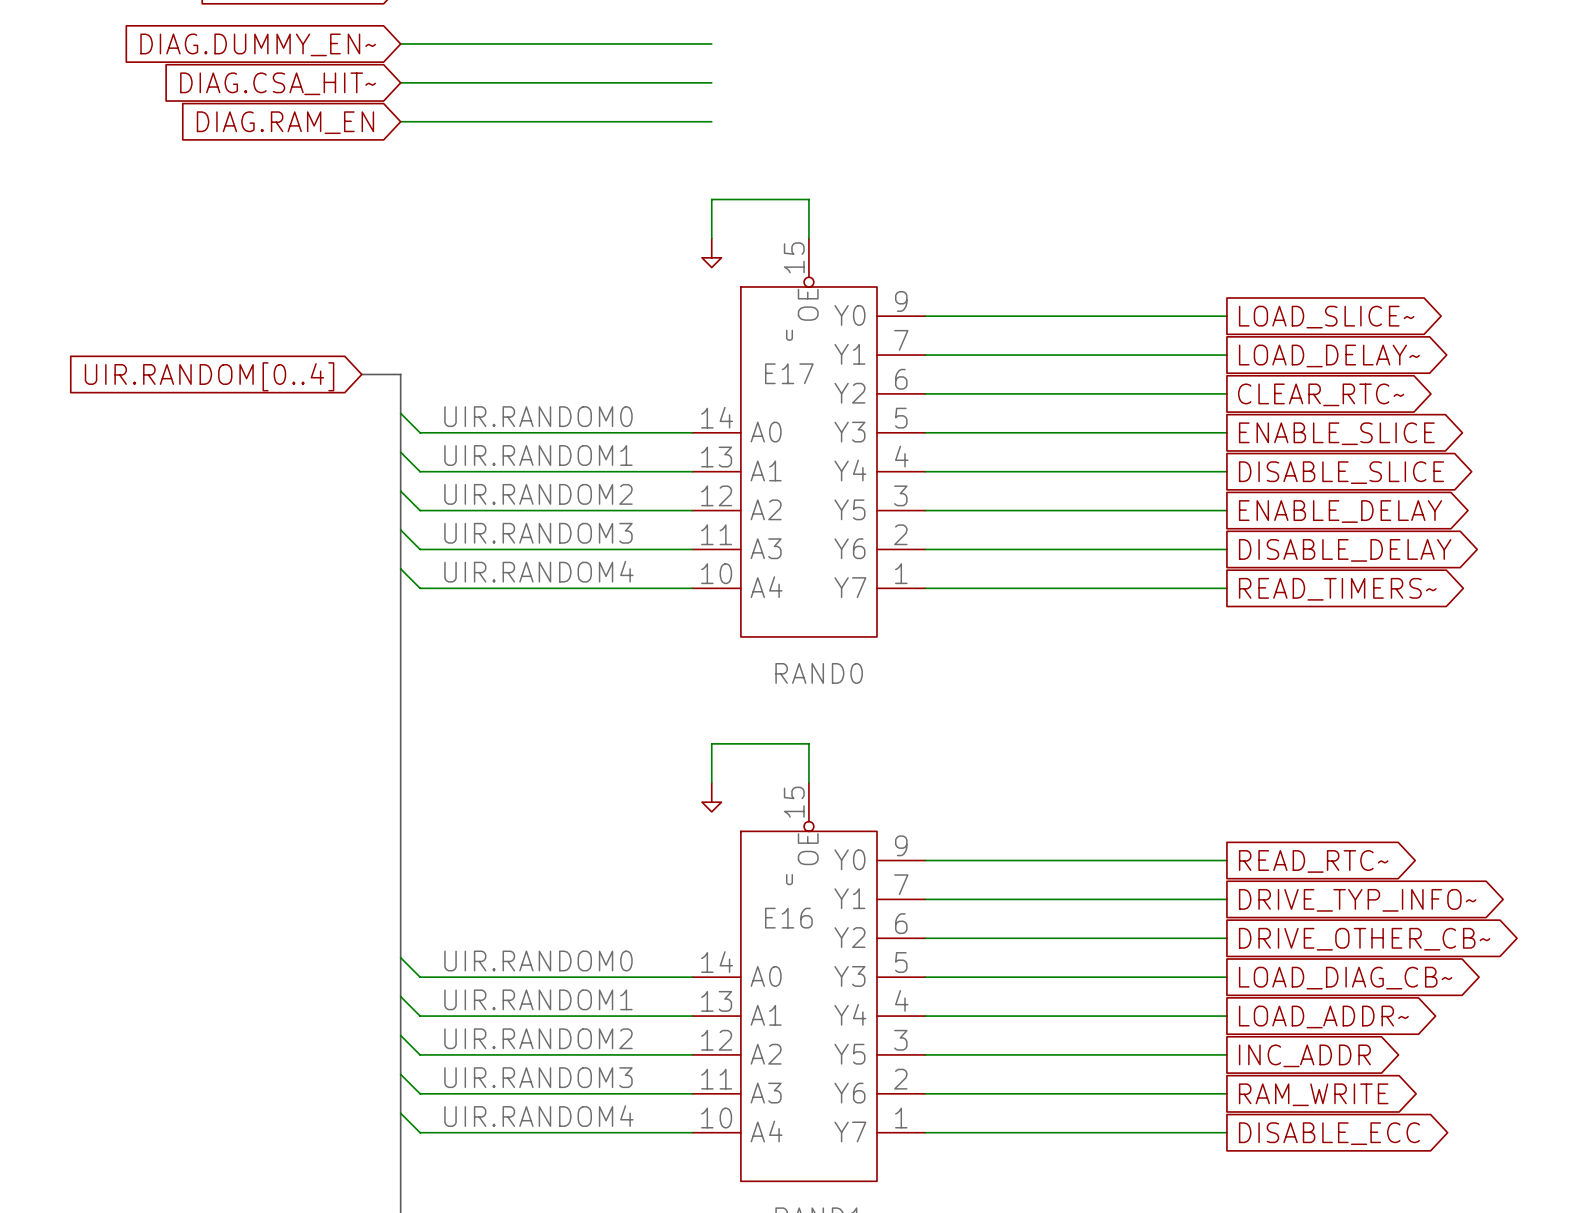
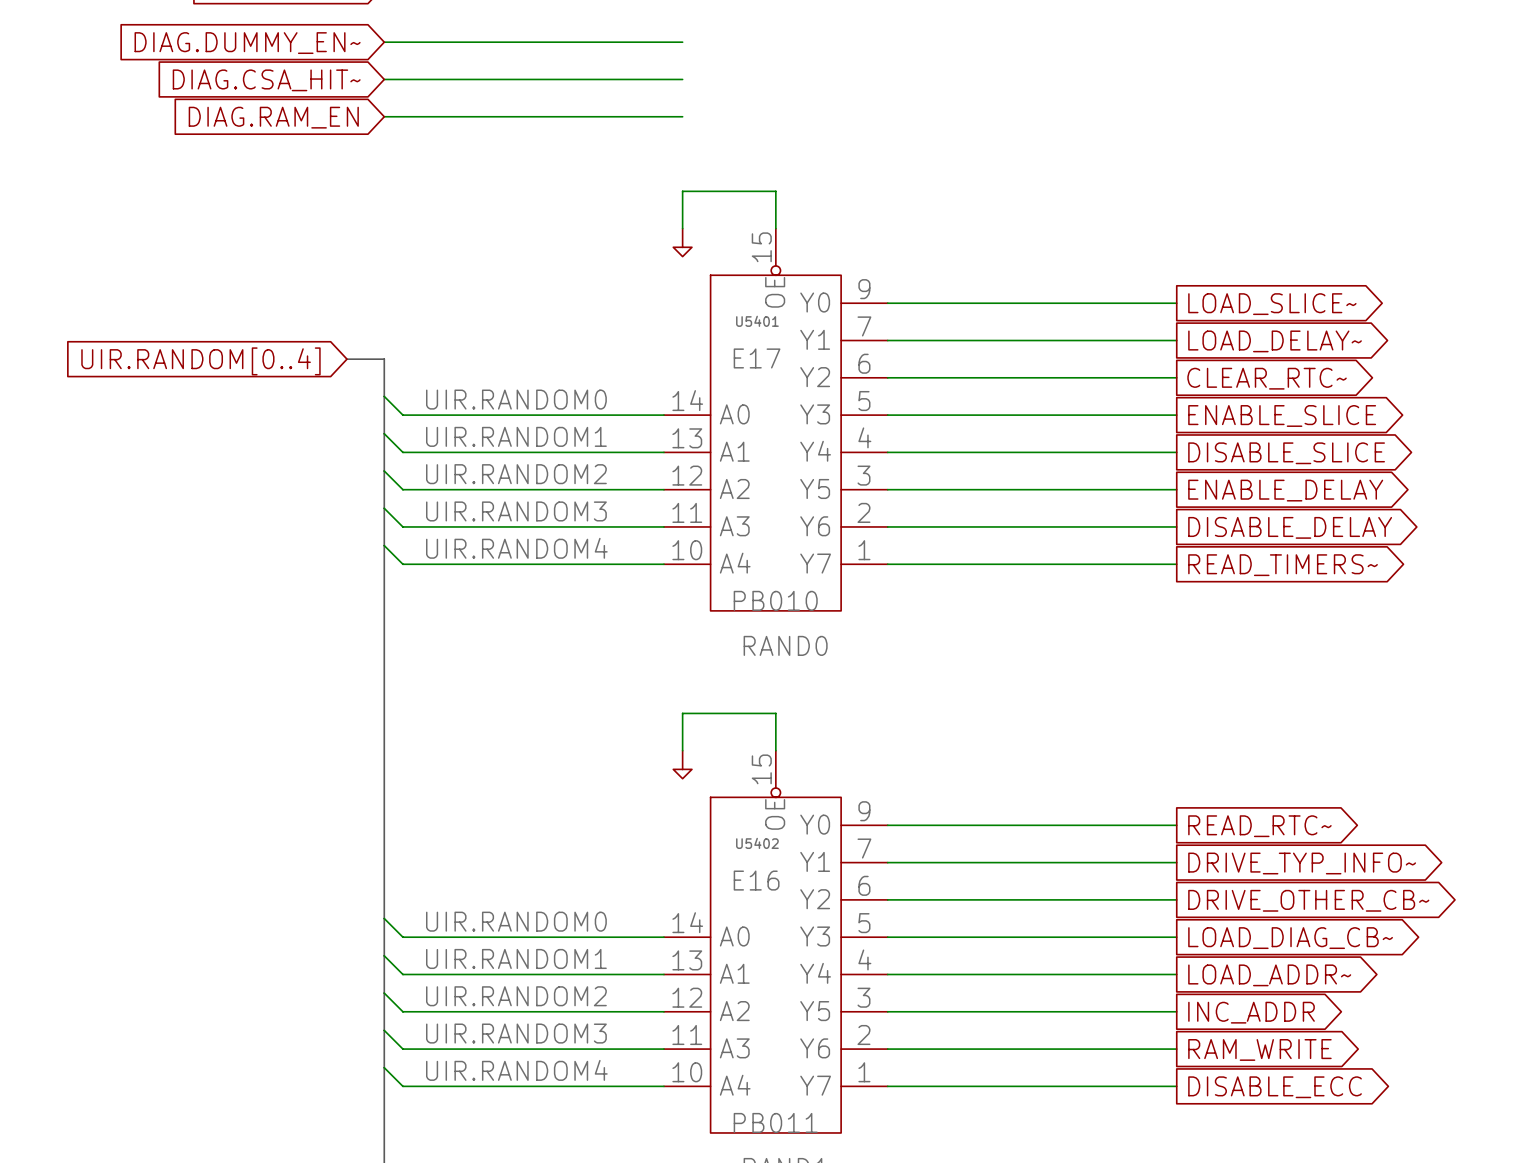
U name: U (789, 335) -> U5401 (757, 321)
U value: none -> PB010 (775, 600)
U name: U (789, 879) -> U5402 (757, 843)
U value: none -> PB011 (775, 1122)

